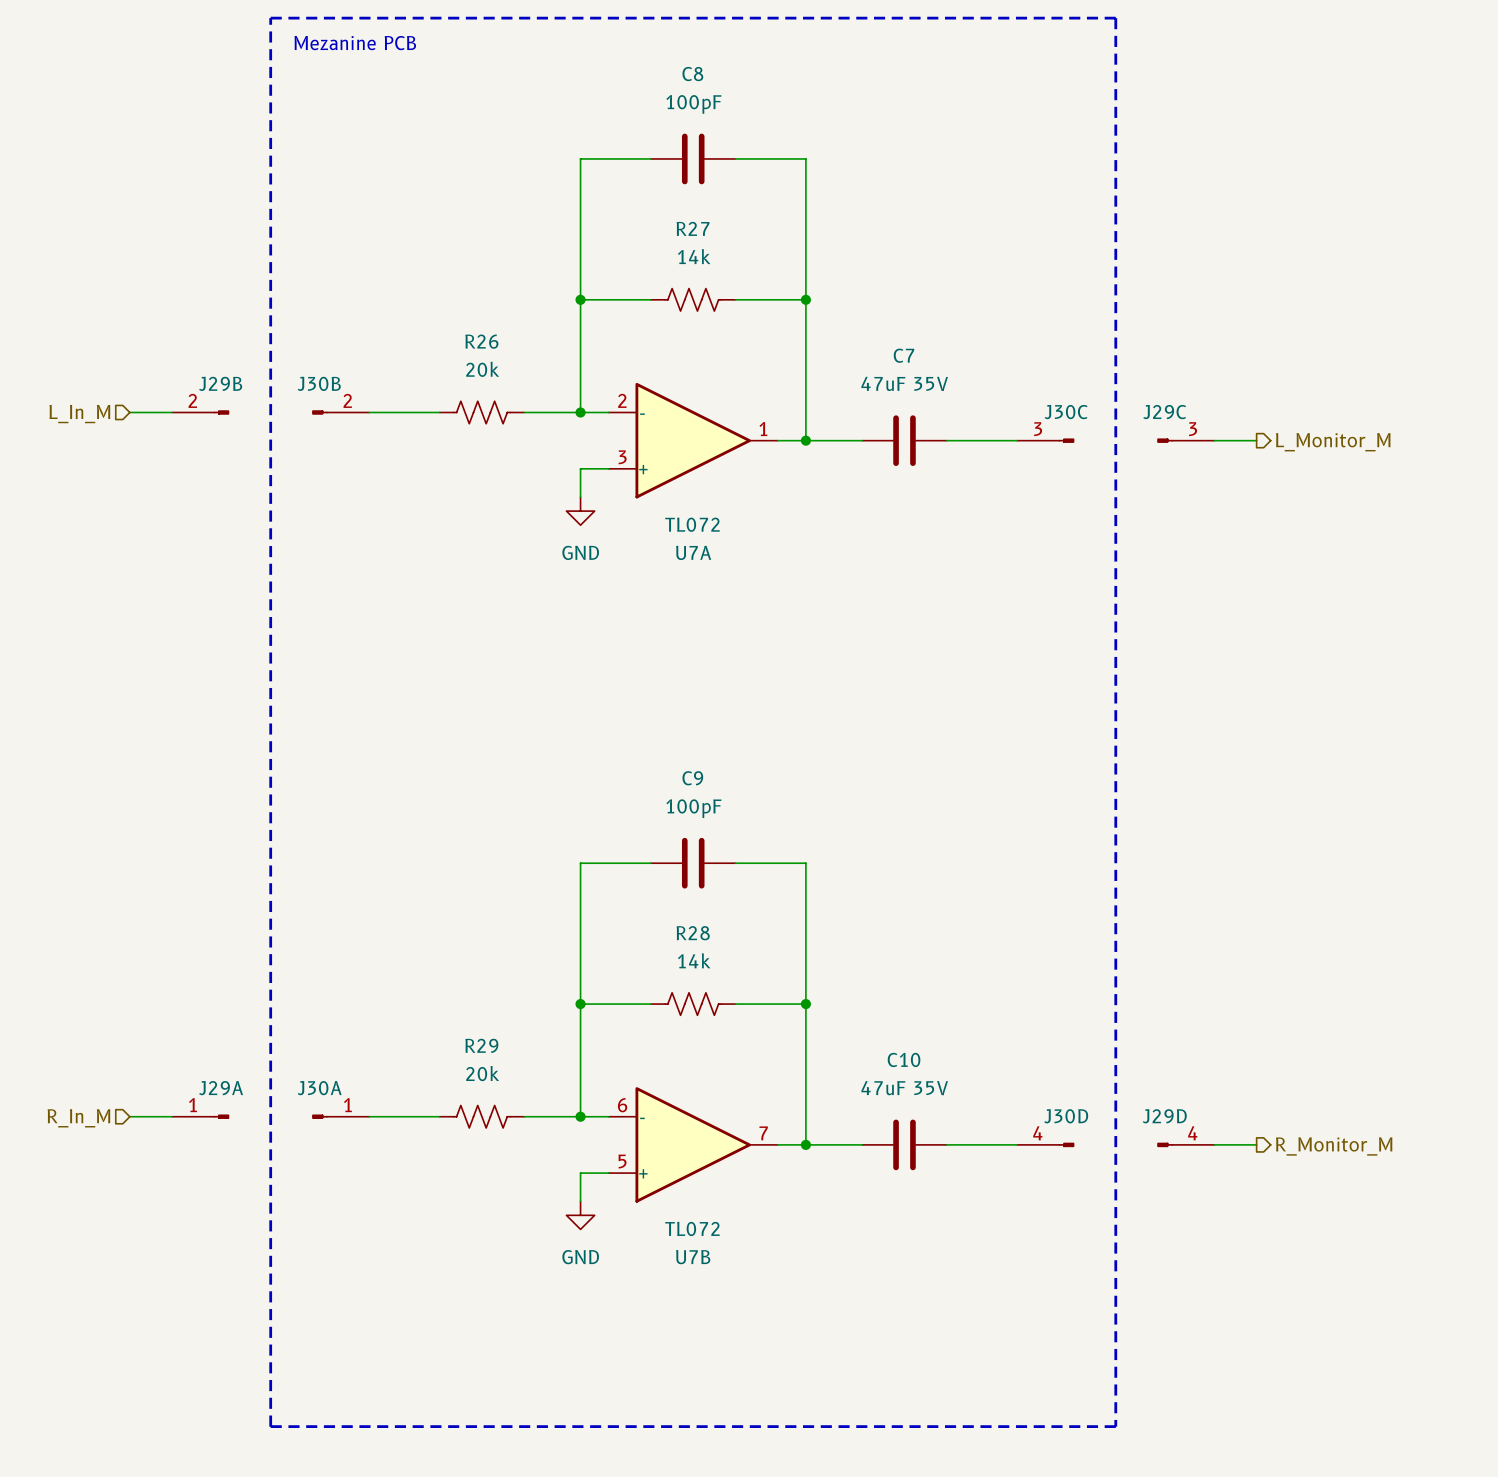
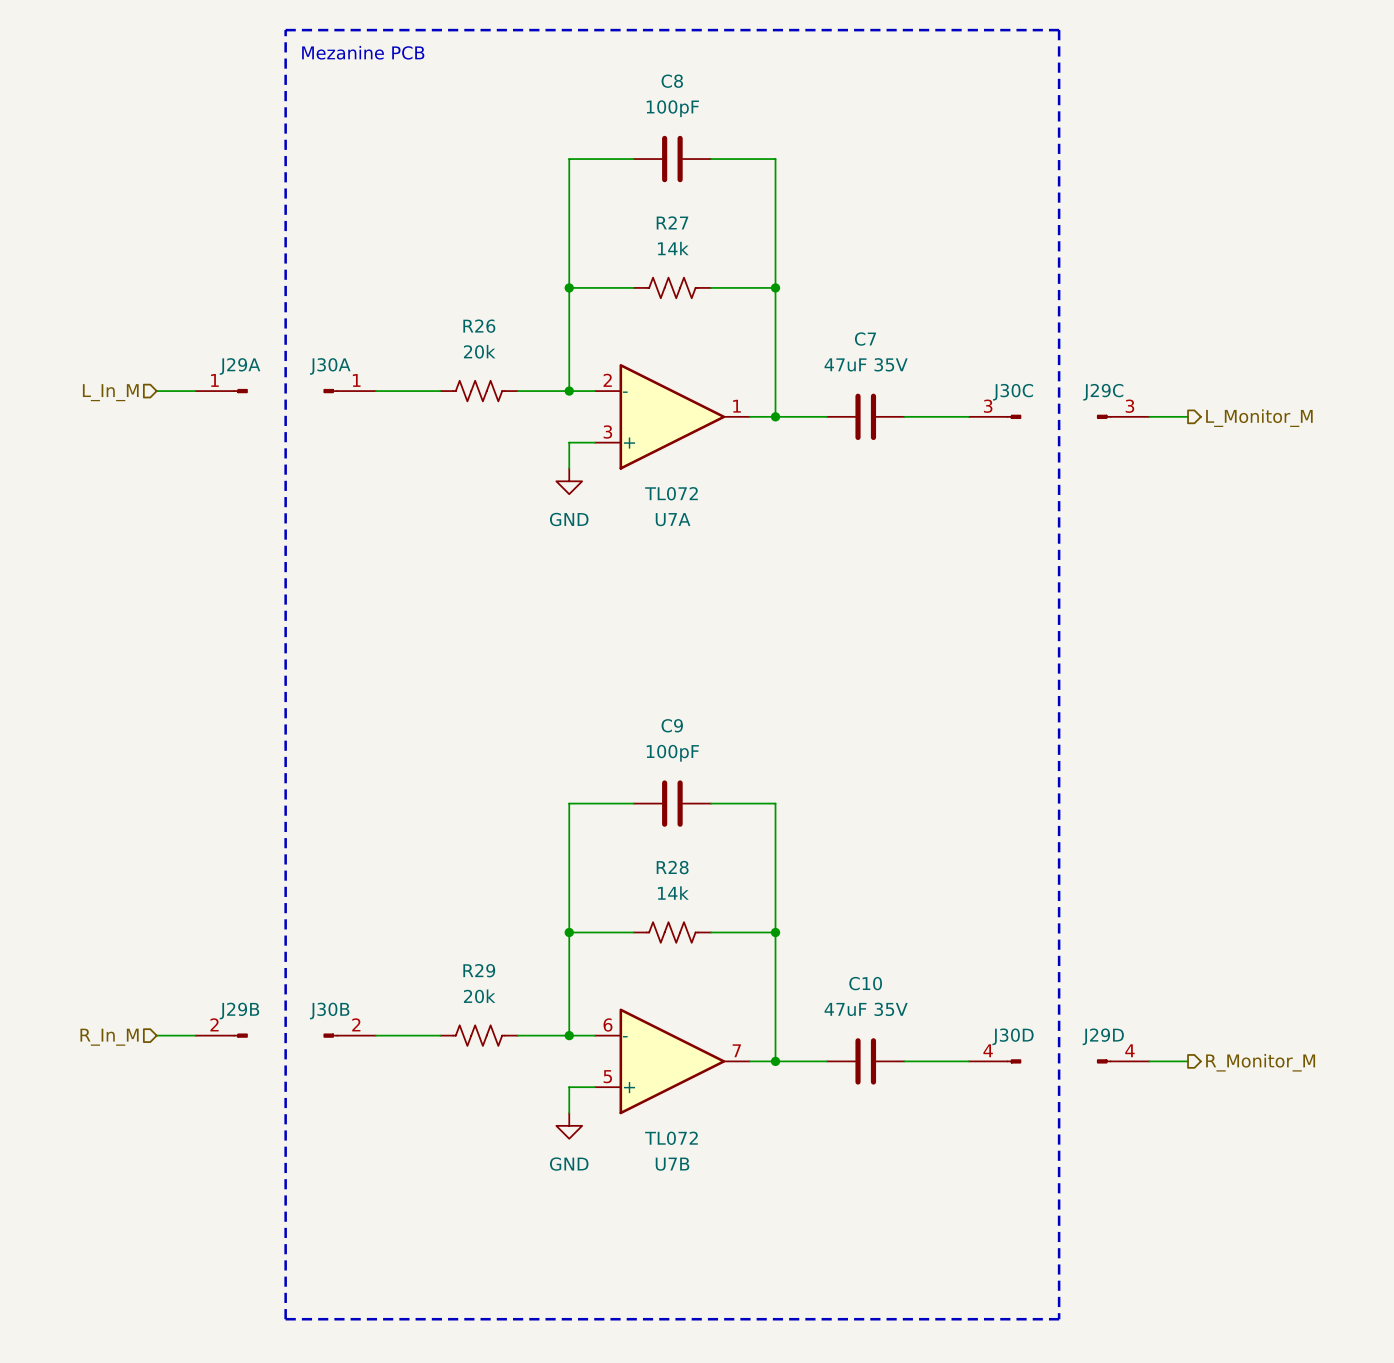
J29B position: (200, 412) -> (221, 1035)
J30B position: (340, 412) -> (349, 1035)
J29A position: (200, 1116) -> (221, 391)
J30A position: (340, 1116) -> (349, 391)

